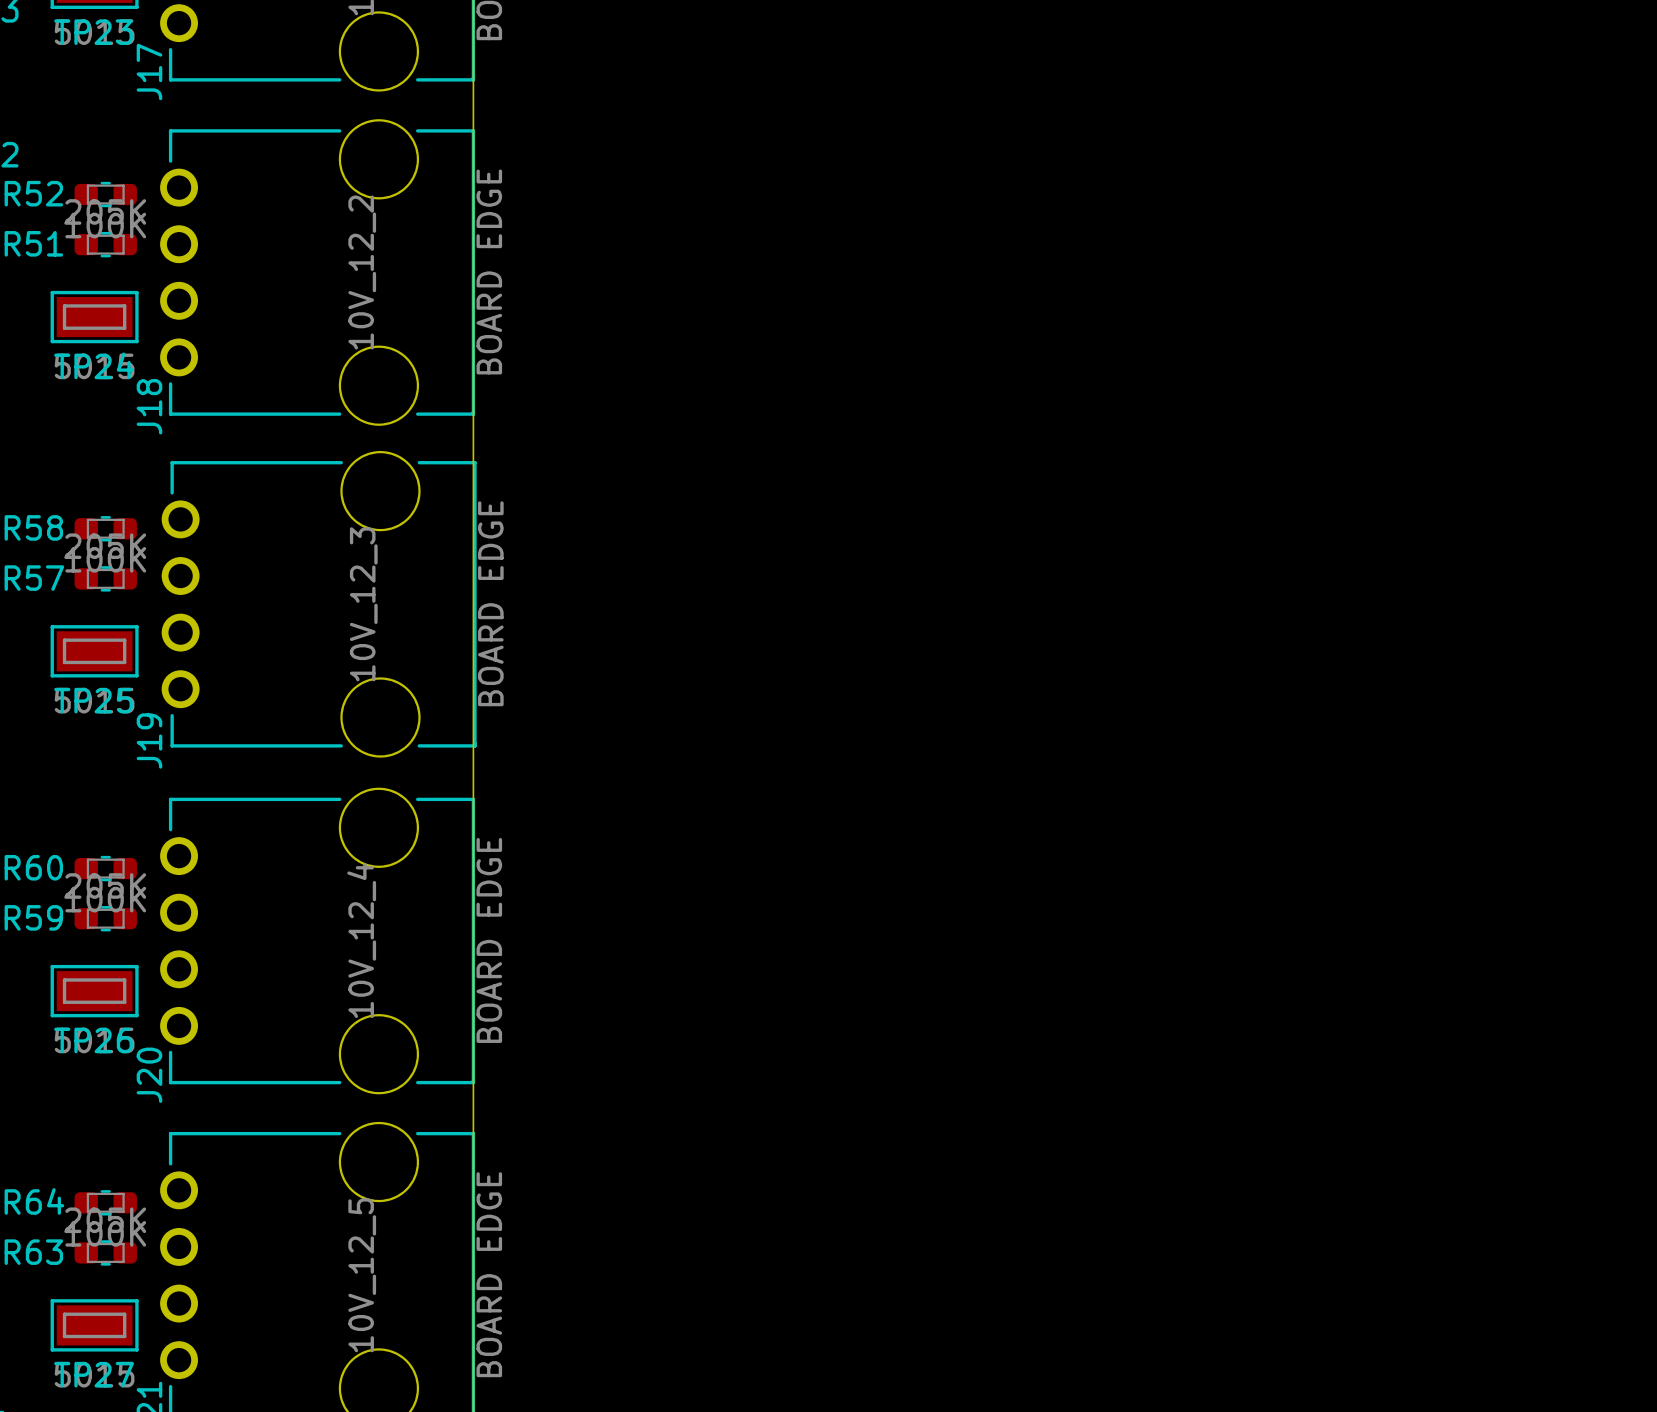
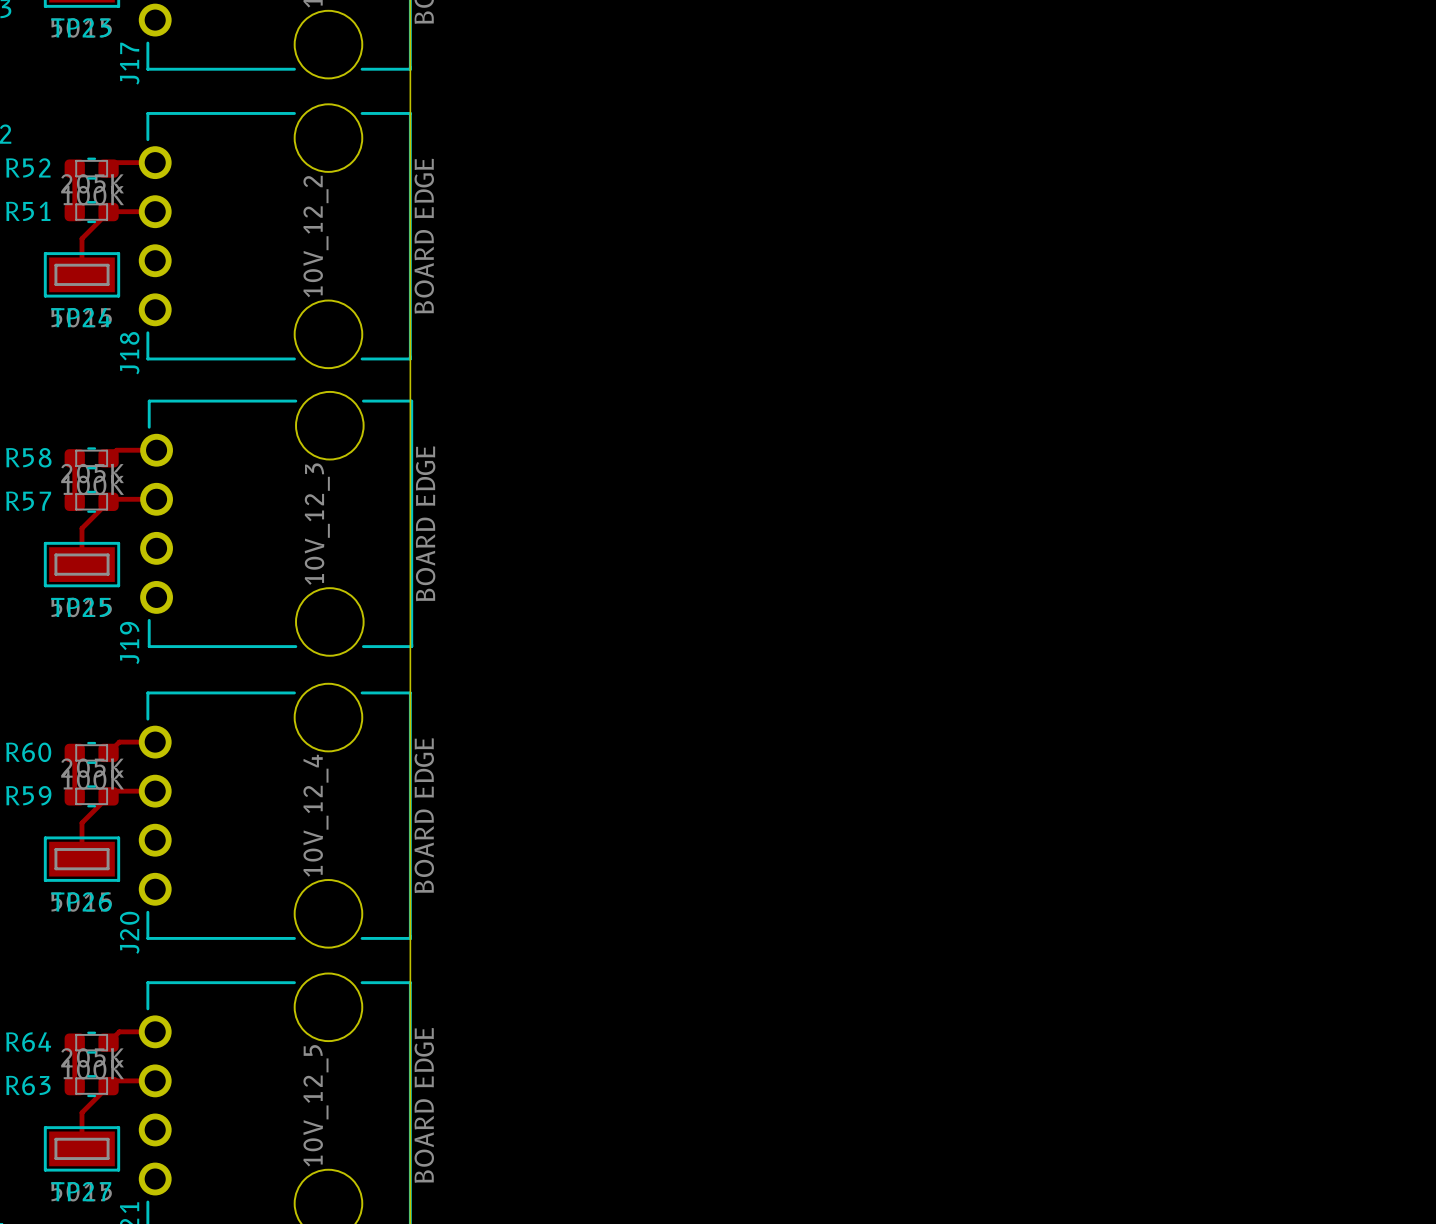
track: none -> (155, 162) (114, 162) (108, 168)
track: none -> (74, 168) (74, 212)
track: none -> (155, 211) (108, 211) (82, 238) (82, 274)
track: none -> (156, 450) (116, 450) (108, 458)
track: none -> (74, 458) (74, 501)
track: none -> (156, 499) (111, 499) (82, 528) (82, 564)
track: none -> (155, 742) (119, 742) (108, 752)
track: none -> (74, 752) (74, 796)
track: none -> (155, 791) (113, 791) (82, 822) (82, 859)
track: none -> (155, 1031) (119, 1031) (108, 1042)
track: none -> (74, 1042) (74, 1086)
track: none -> (155, 1080) (113, 1080) (82, 1112) (82, 1148)

